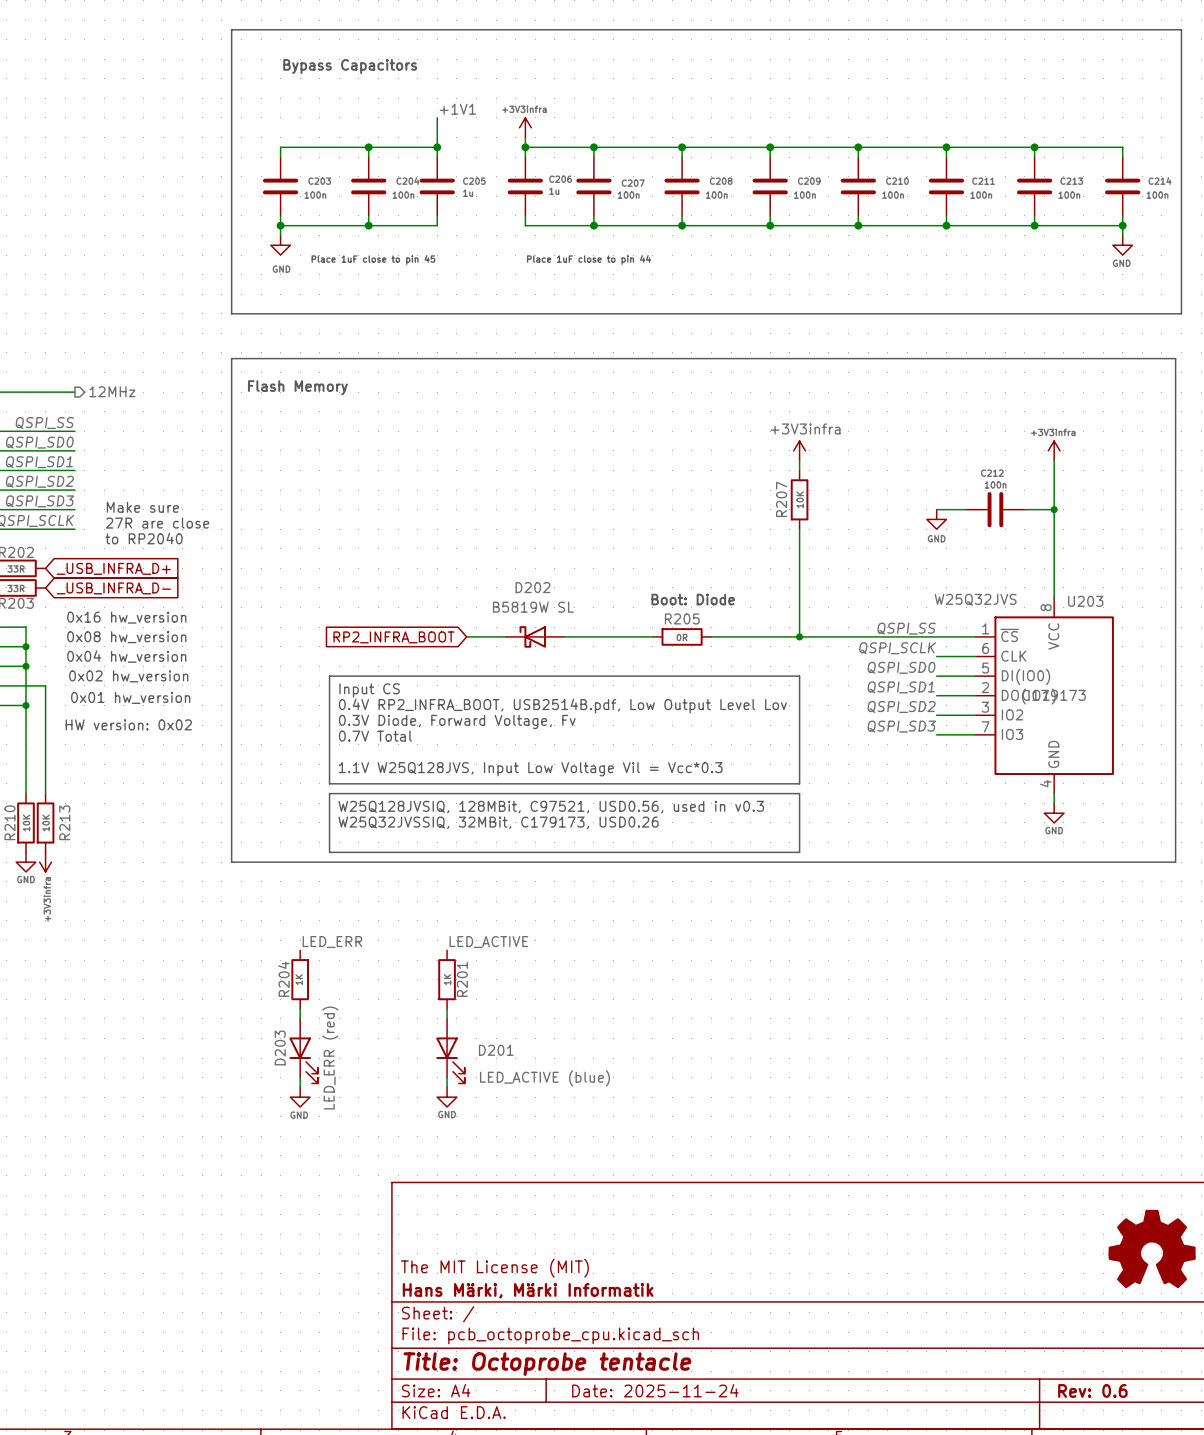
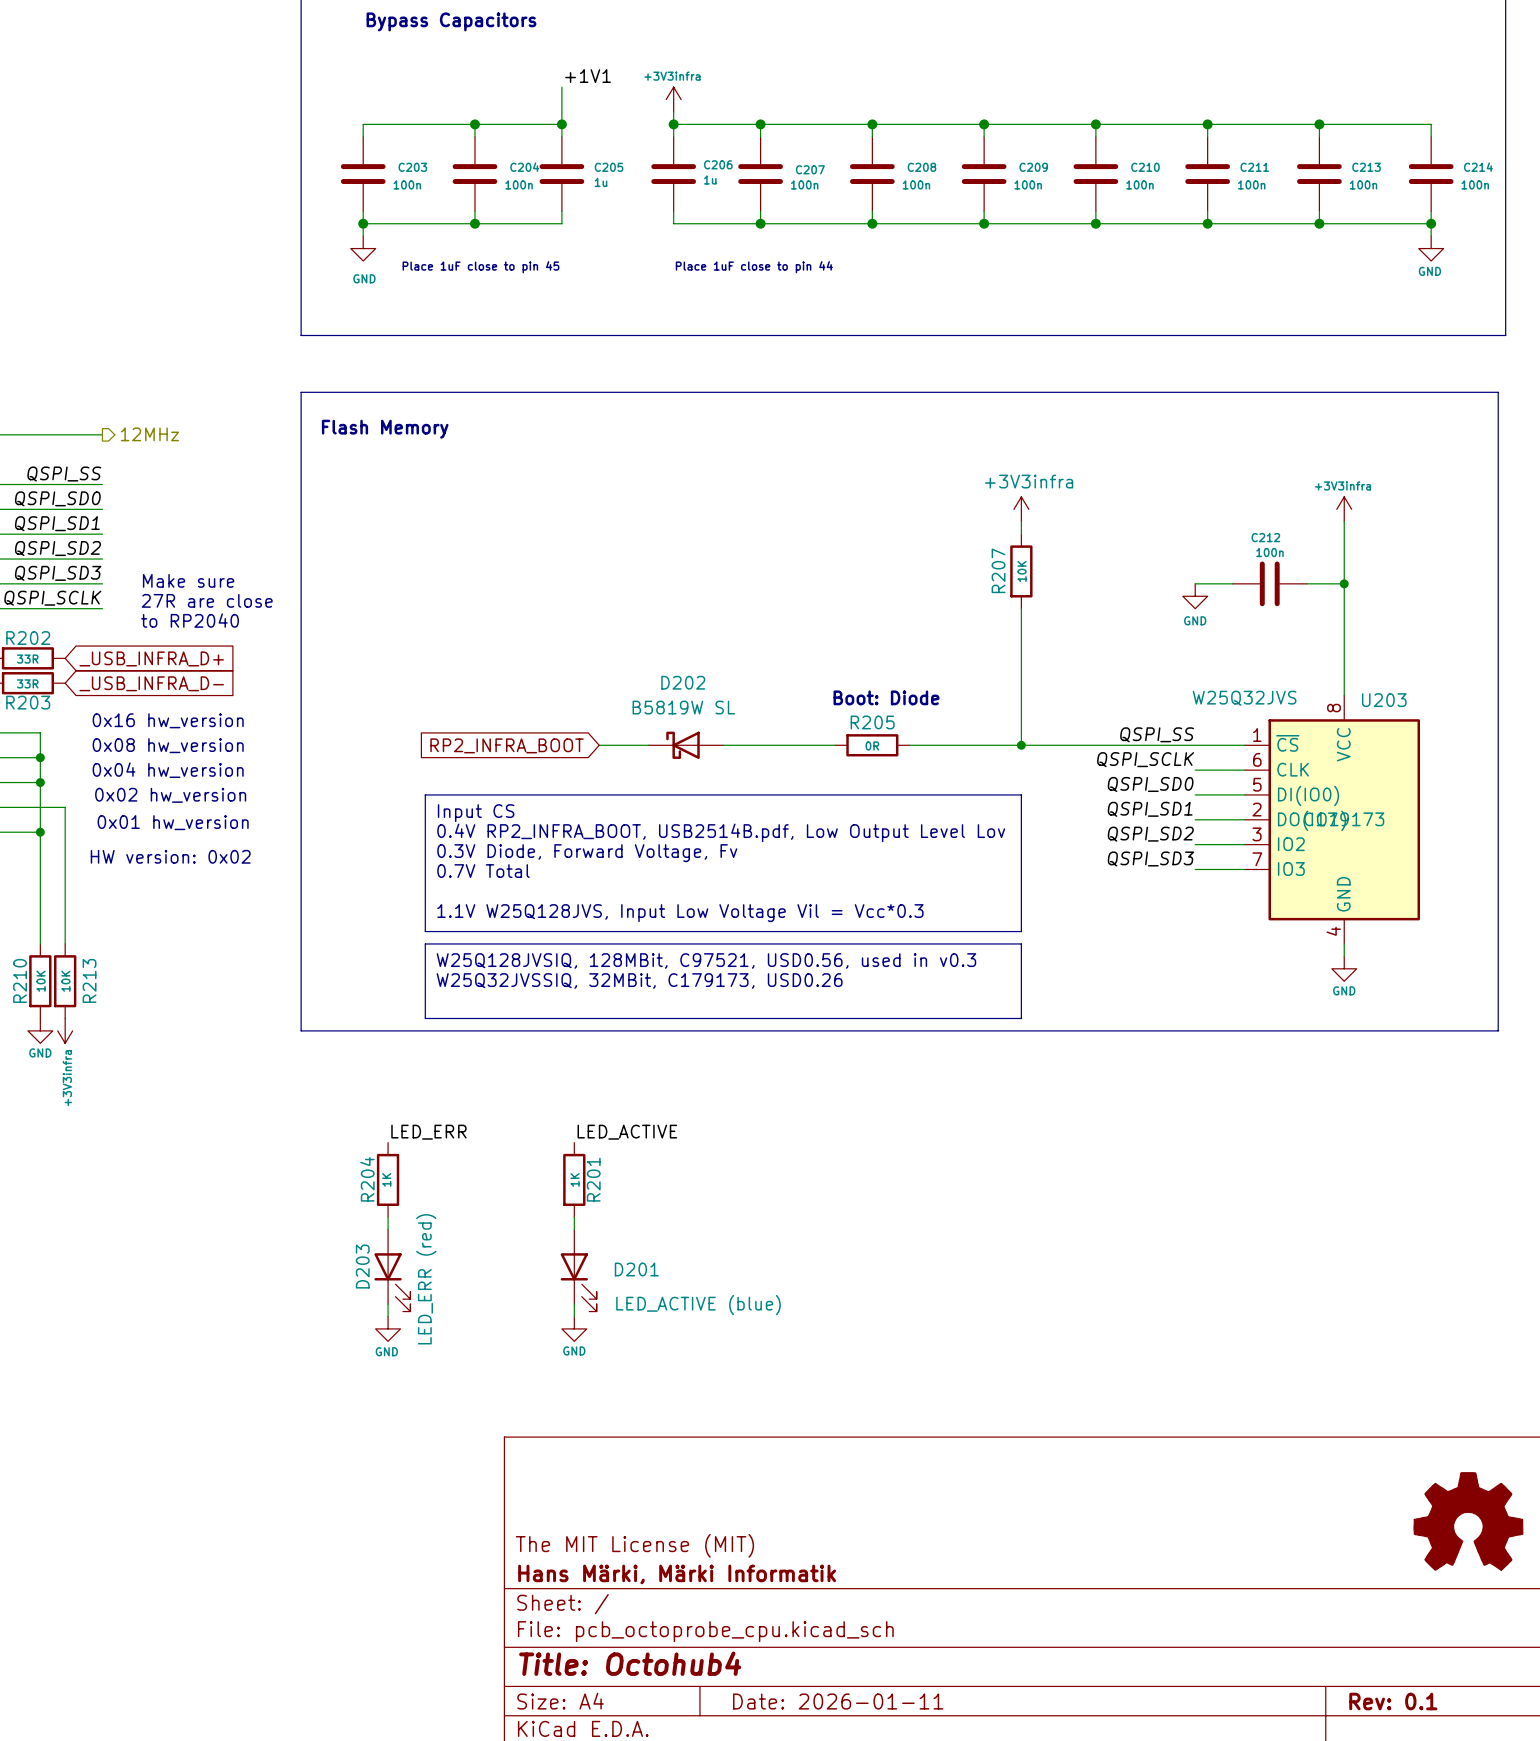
title block: Title: Octoprobe tentacle (547, 1364) -> Title: Octohub4 (630, 1663)
title block: Date: 2025-11-24 (655, 1390) -> Date: 2026-01-11 (838, 1701)
title block: Rev: 0.6 (1092, 1390) -> Rev: 0.1 (1393, 1701)

